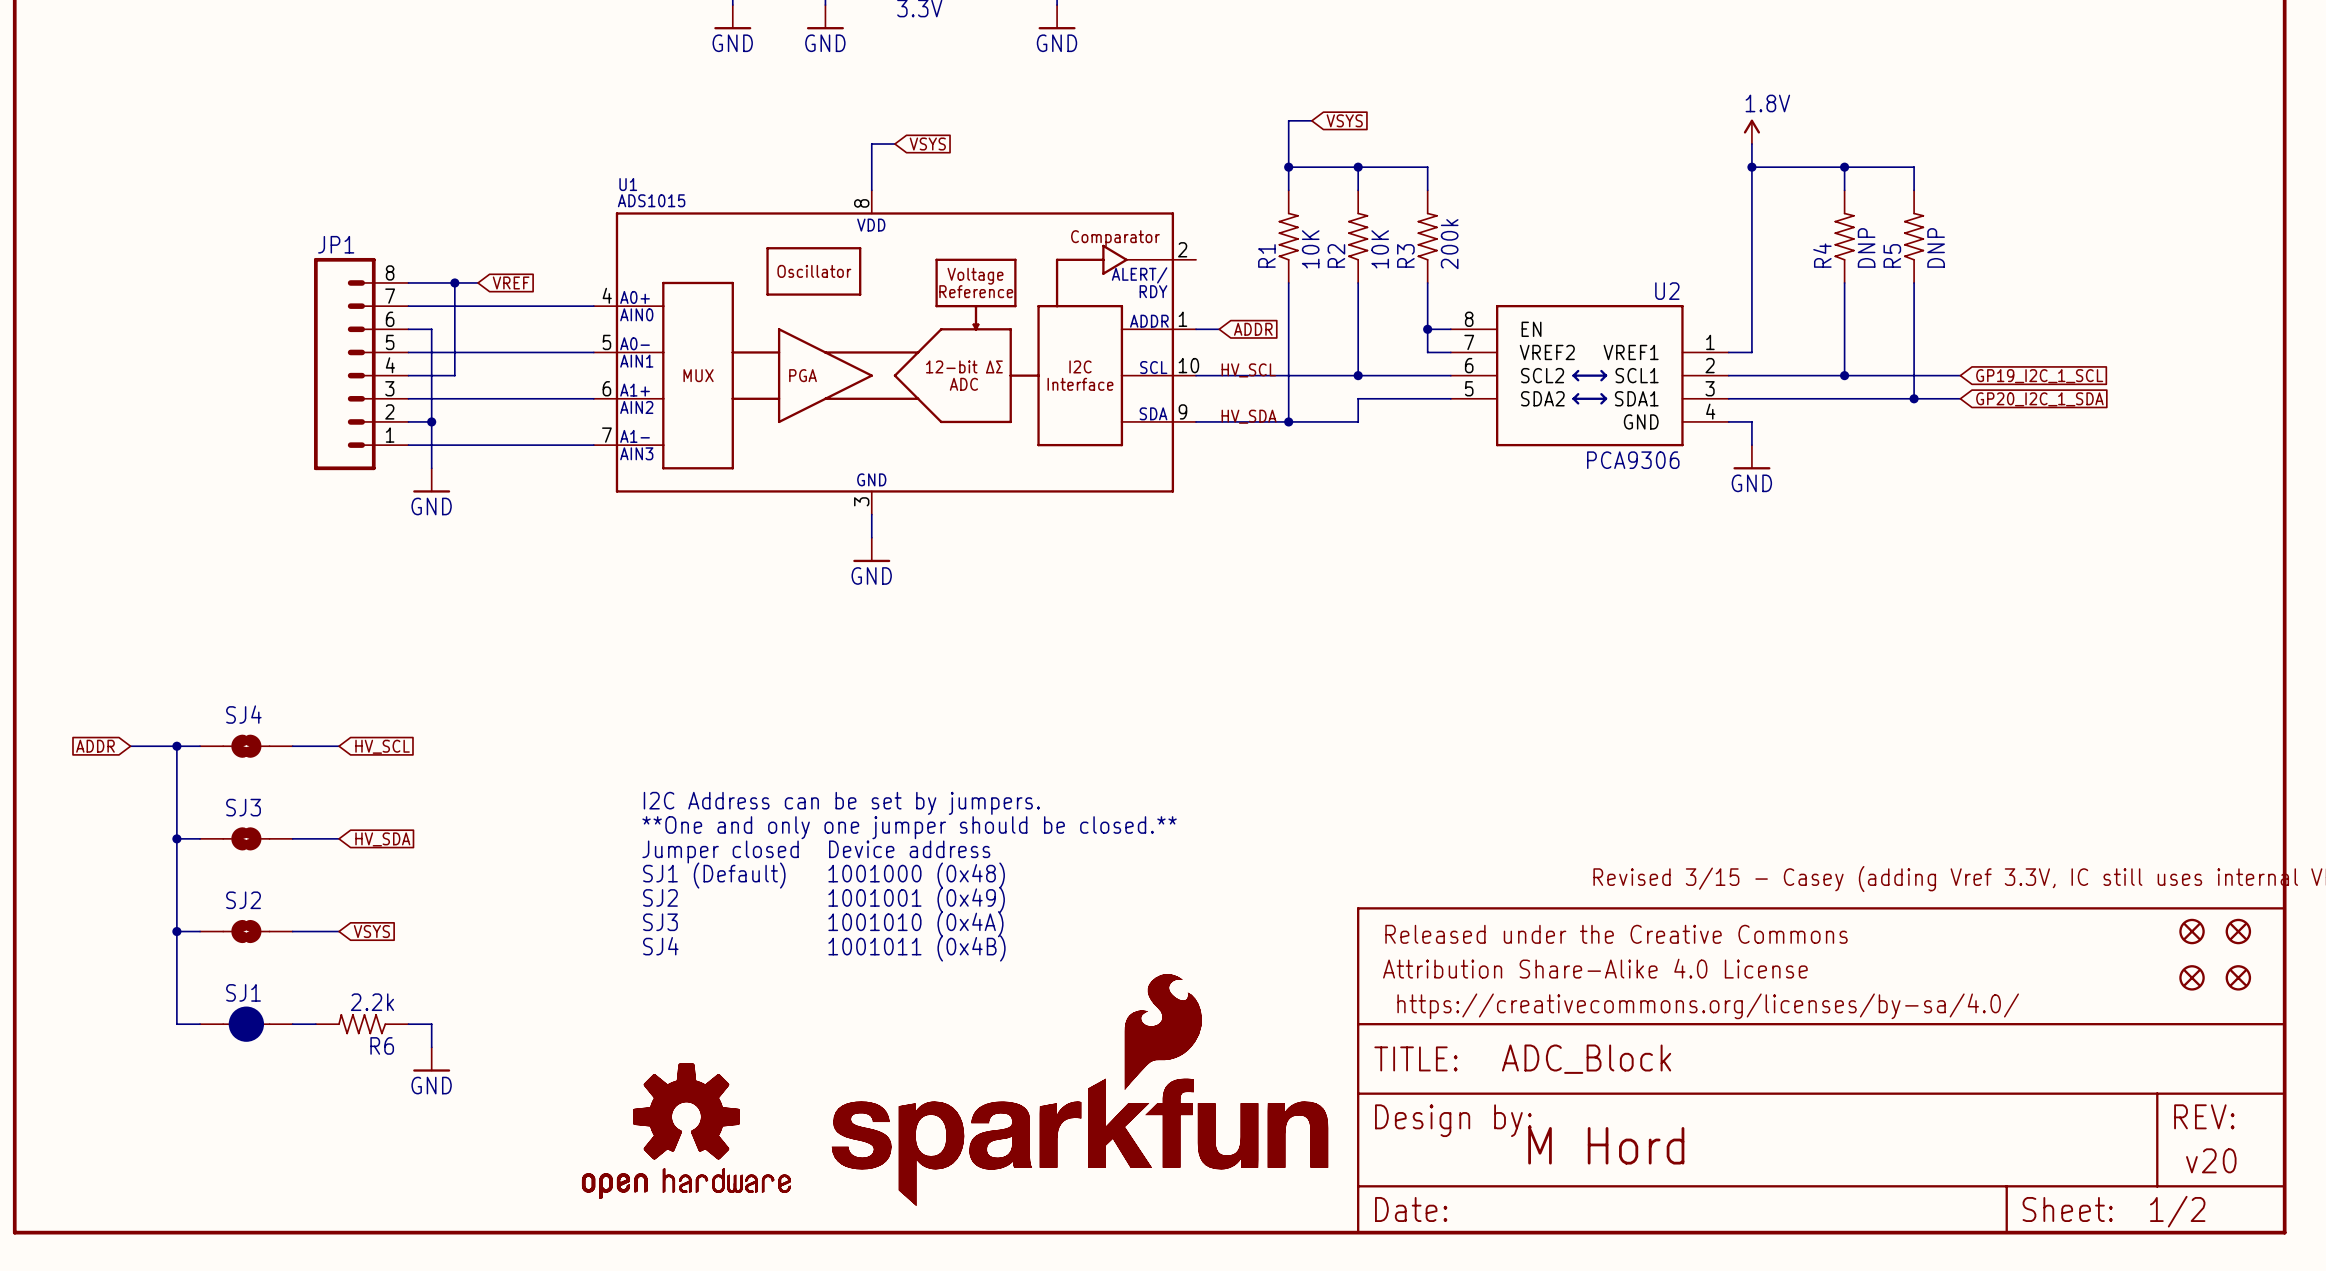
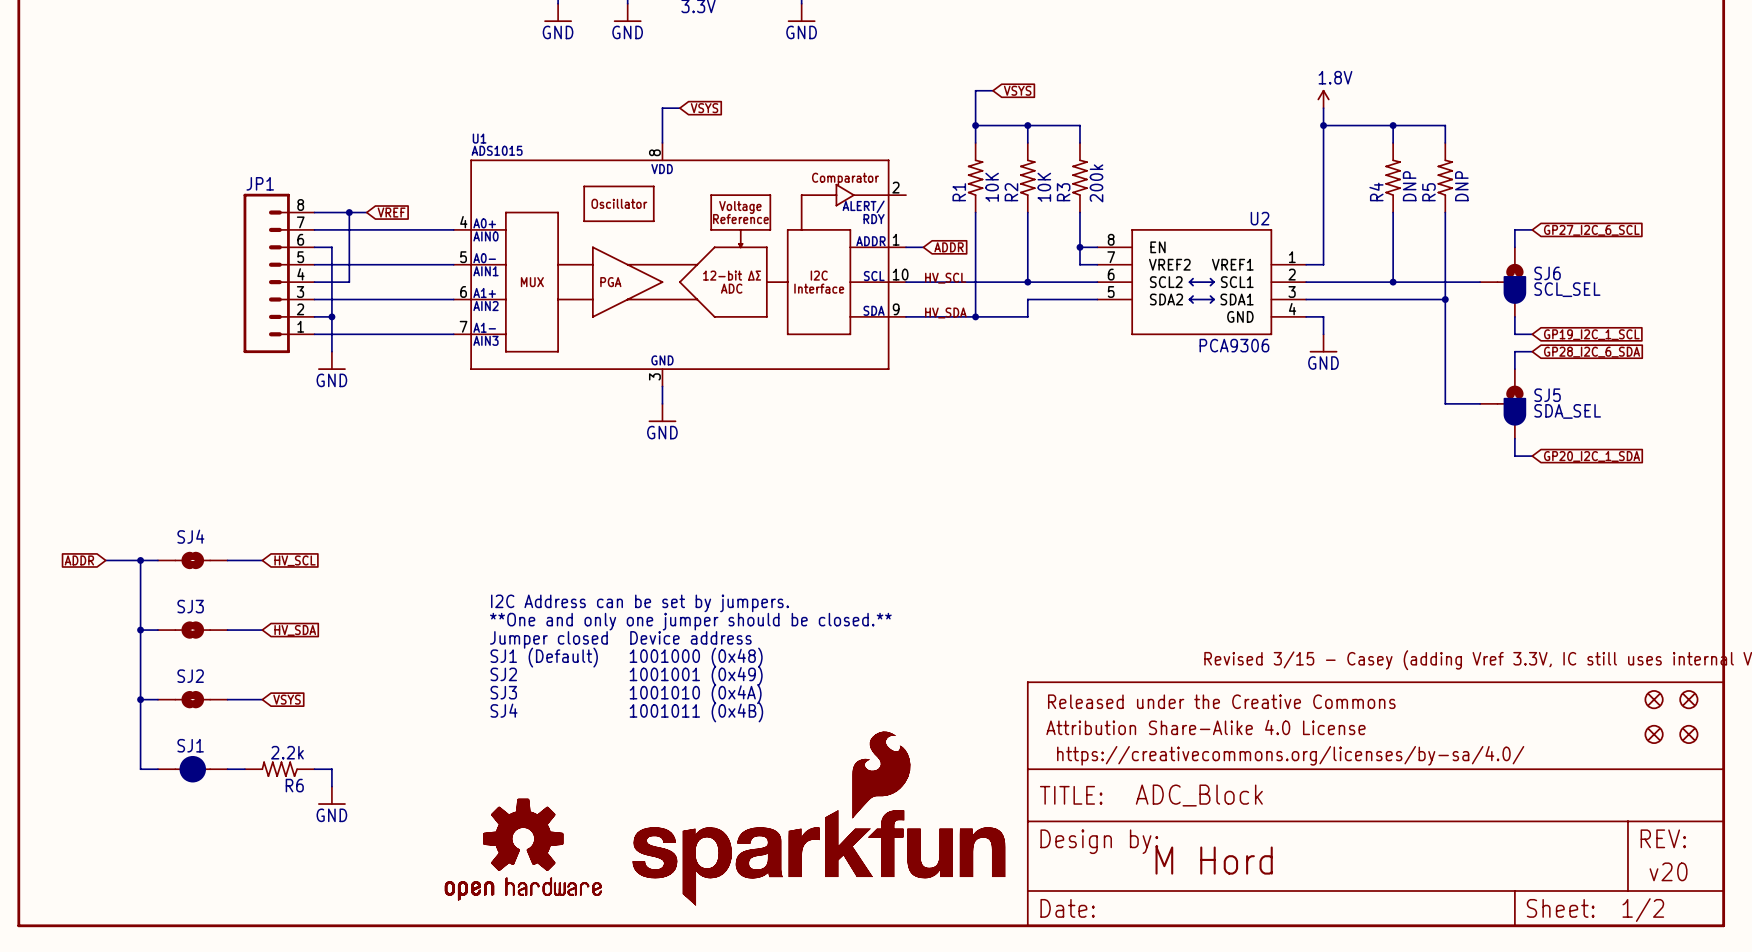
wire: none -> (1532, 229) (1514, 229) (1514, 247)
global label: none -> GP27_I2C_6_SCL (1591, 230)
SJ6: none -> SCL_SEL (1503, 282)
global label position: GP19_I2C_1_SCL (2039, 376) -> GP19_I2C_1_SCL (1591, 334)
wire: (1914, 398) (1960, 398) -> (1445, 299) (1445, 403) (1480, 403)
global label position: GP20_I2C_1_SDA (2039, 399) -> GP20_I2C_1_SDA (1592, 456)
wire: none -> (1514, 316) (1514, 334) (1532, 334)
wire: none -> (1532, 351) (1514, 351) (1514, 369)
global label: none -> GP28_I2C_6_SDA (1592, 352)
SJ5: none -> SDA_SEL (1503, 403)
wire: none -> (1514, 438) (1514, 456) (1532, 456)

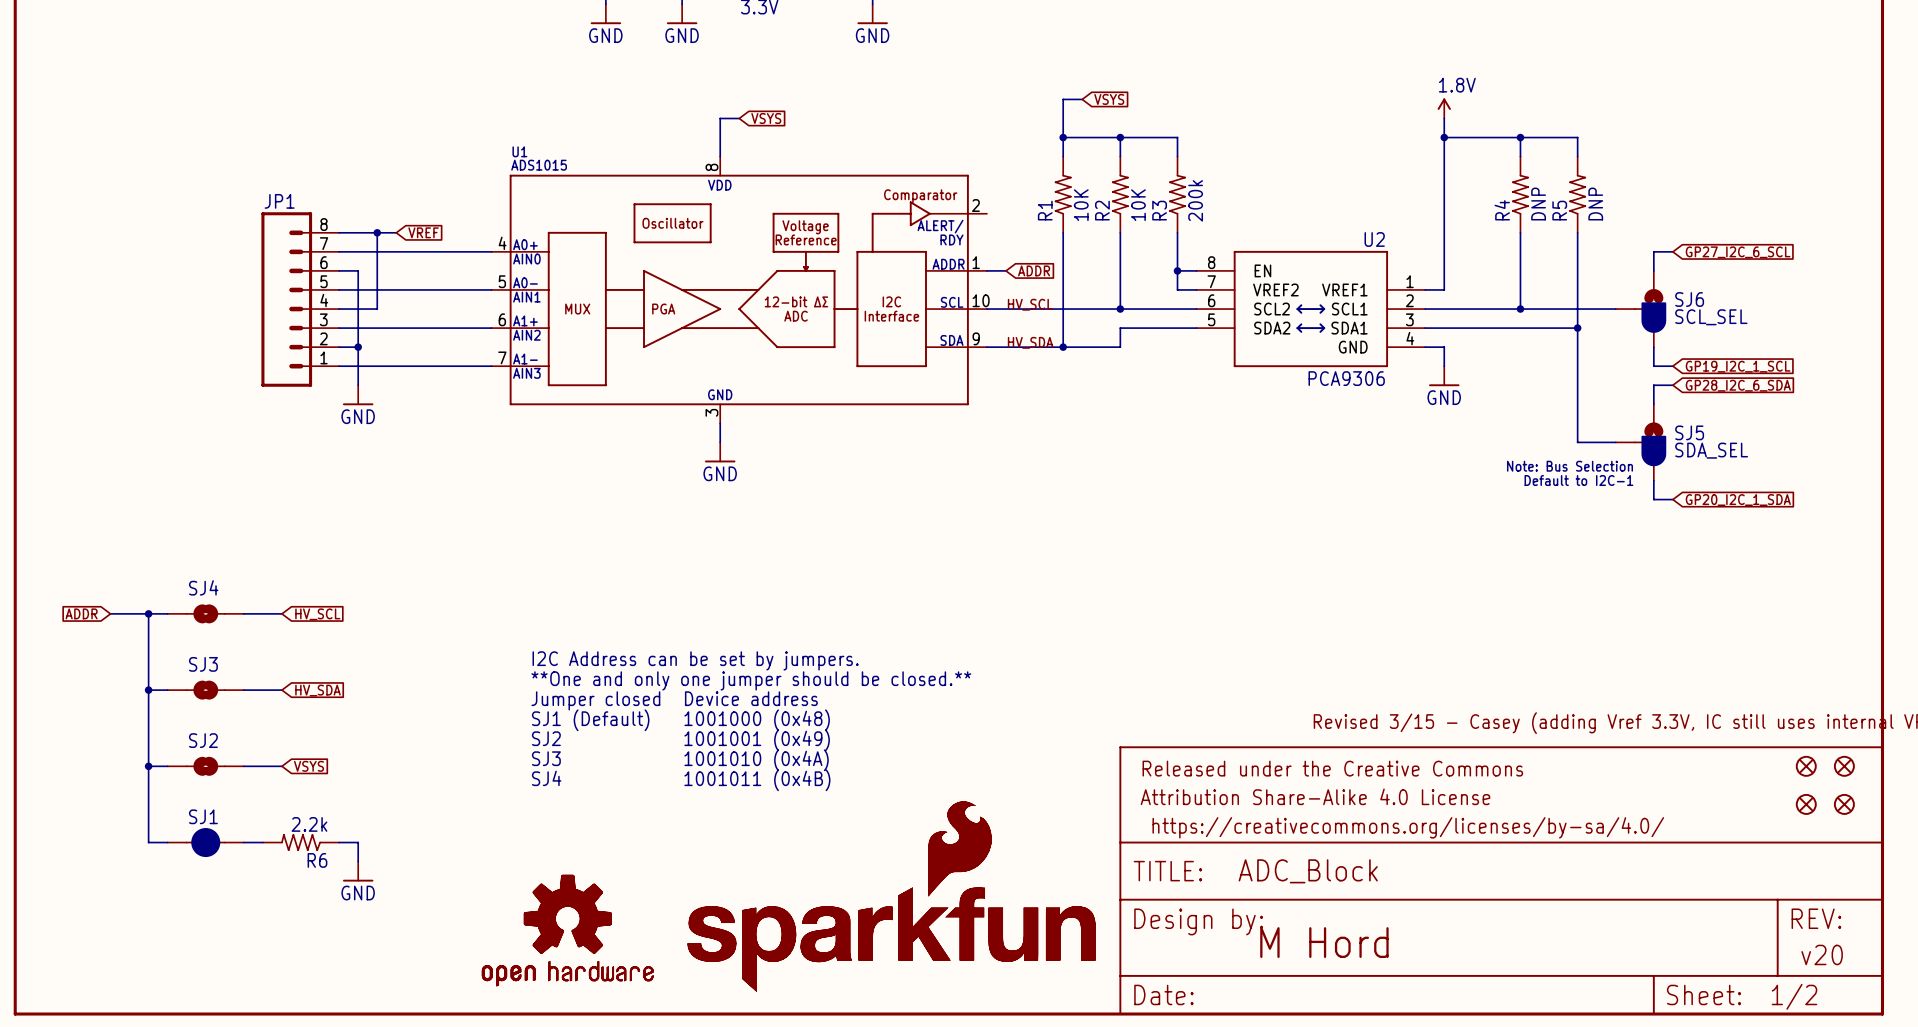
text: none -> Note: Bus Selection (1569, 466)
text: none -> Default to I2C-1 (1578, 480)

